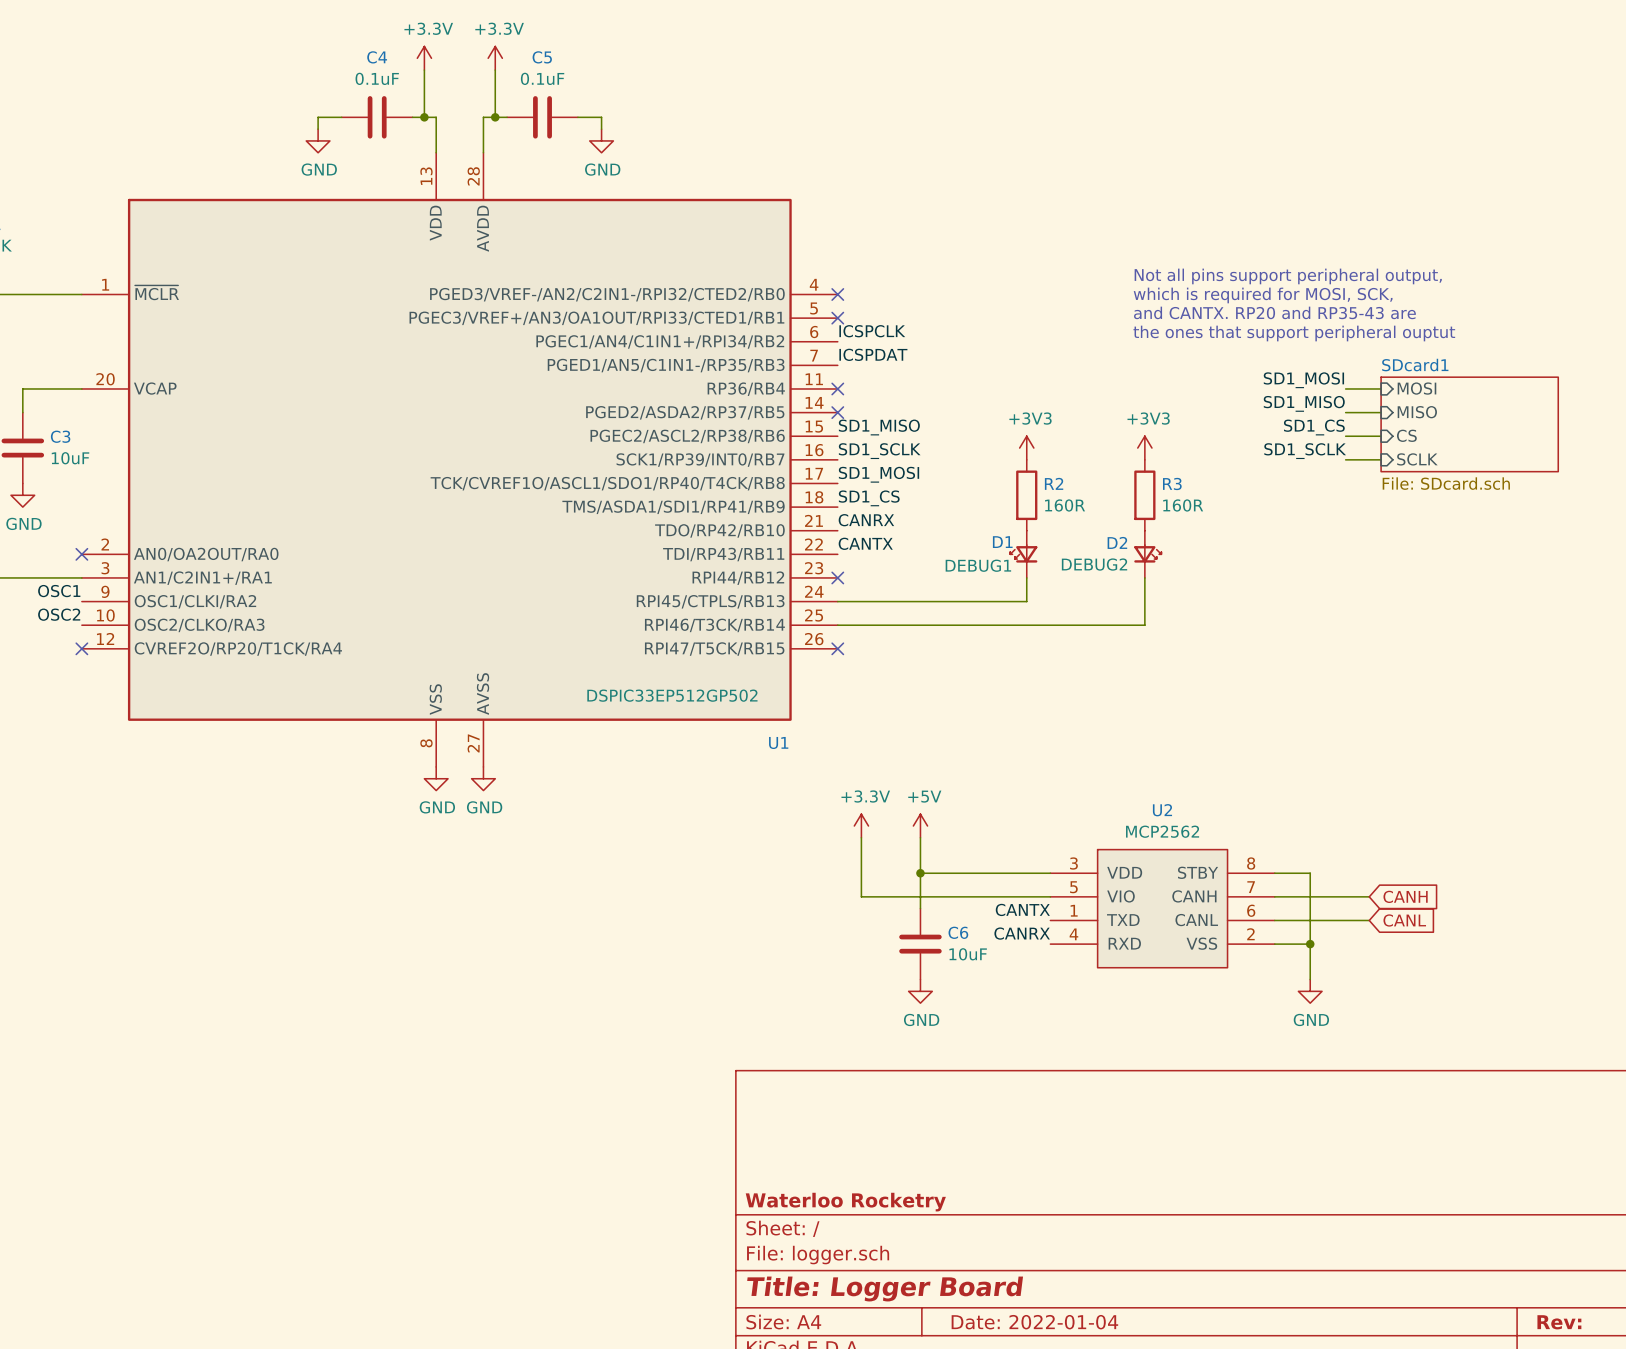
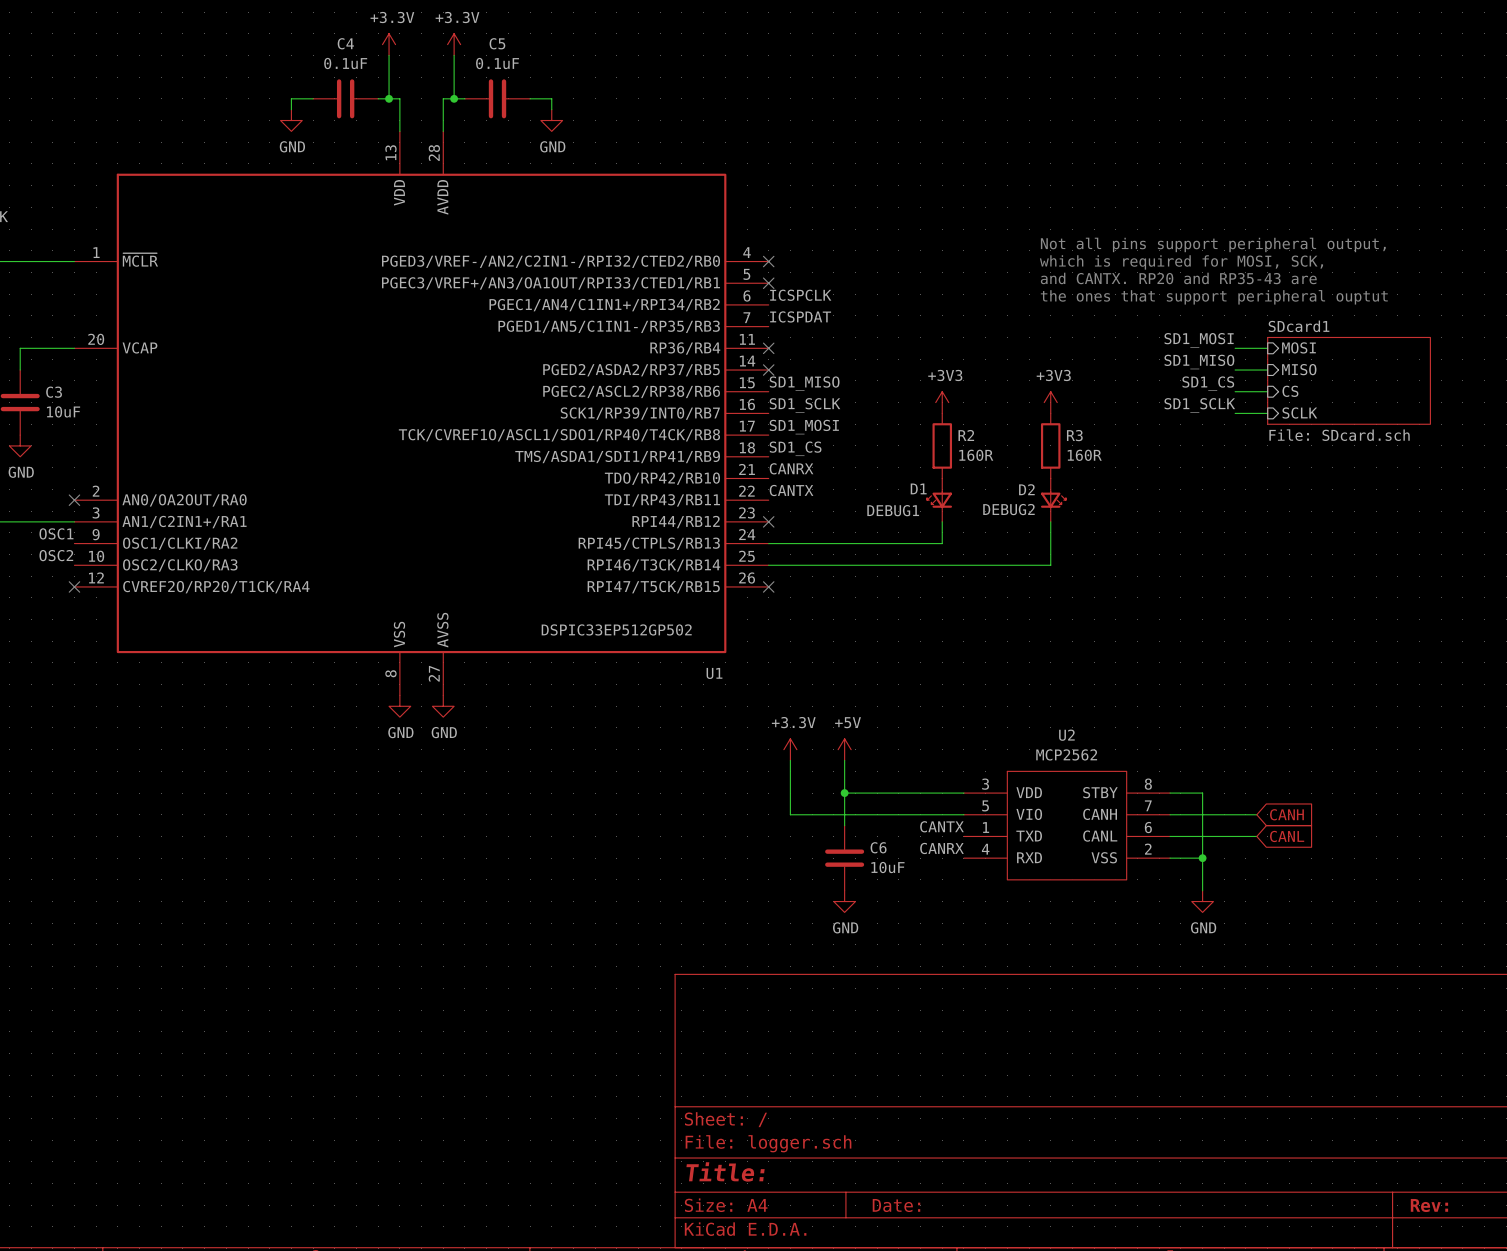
title block: Waterloo Rocketry (845, 1202) -> none
title block: Title: Logger Board (885, 1289) -> Title: (725, 1171)
title block: Date: 2022-01-04 (1034, 1322) -> Date: (896, 1205)

